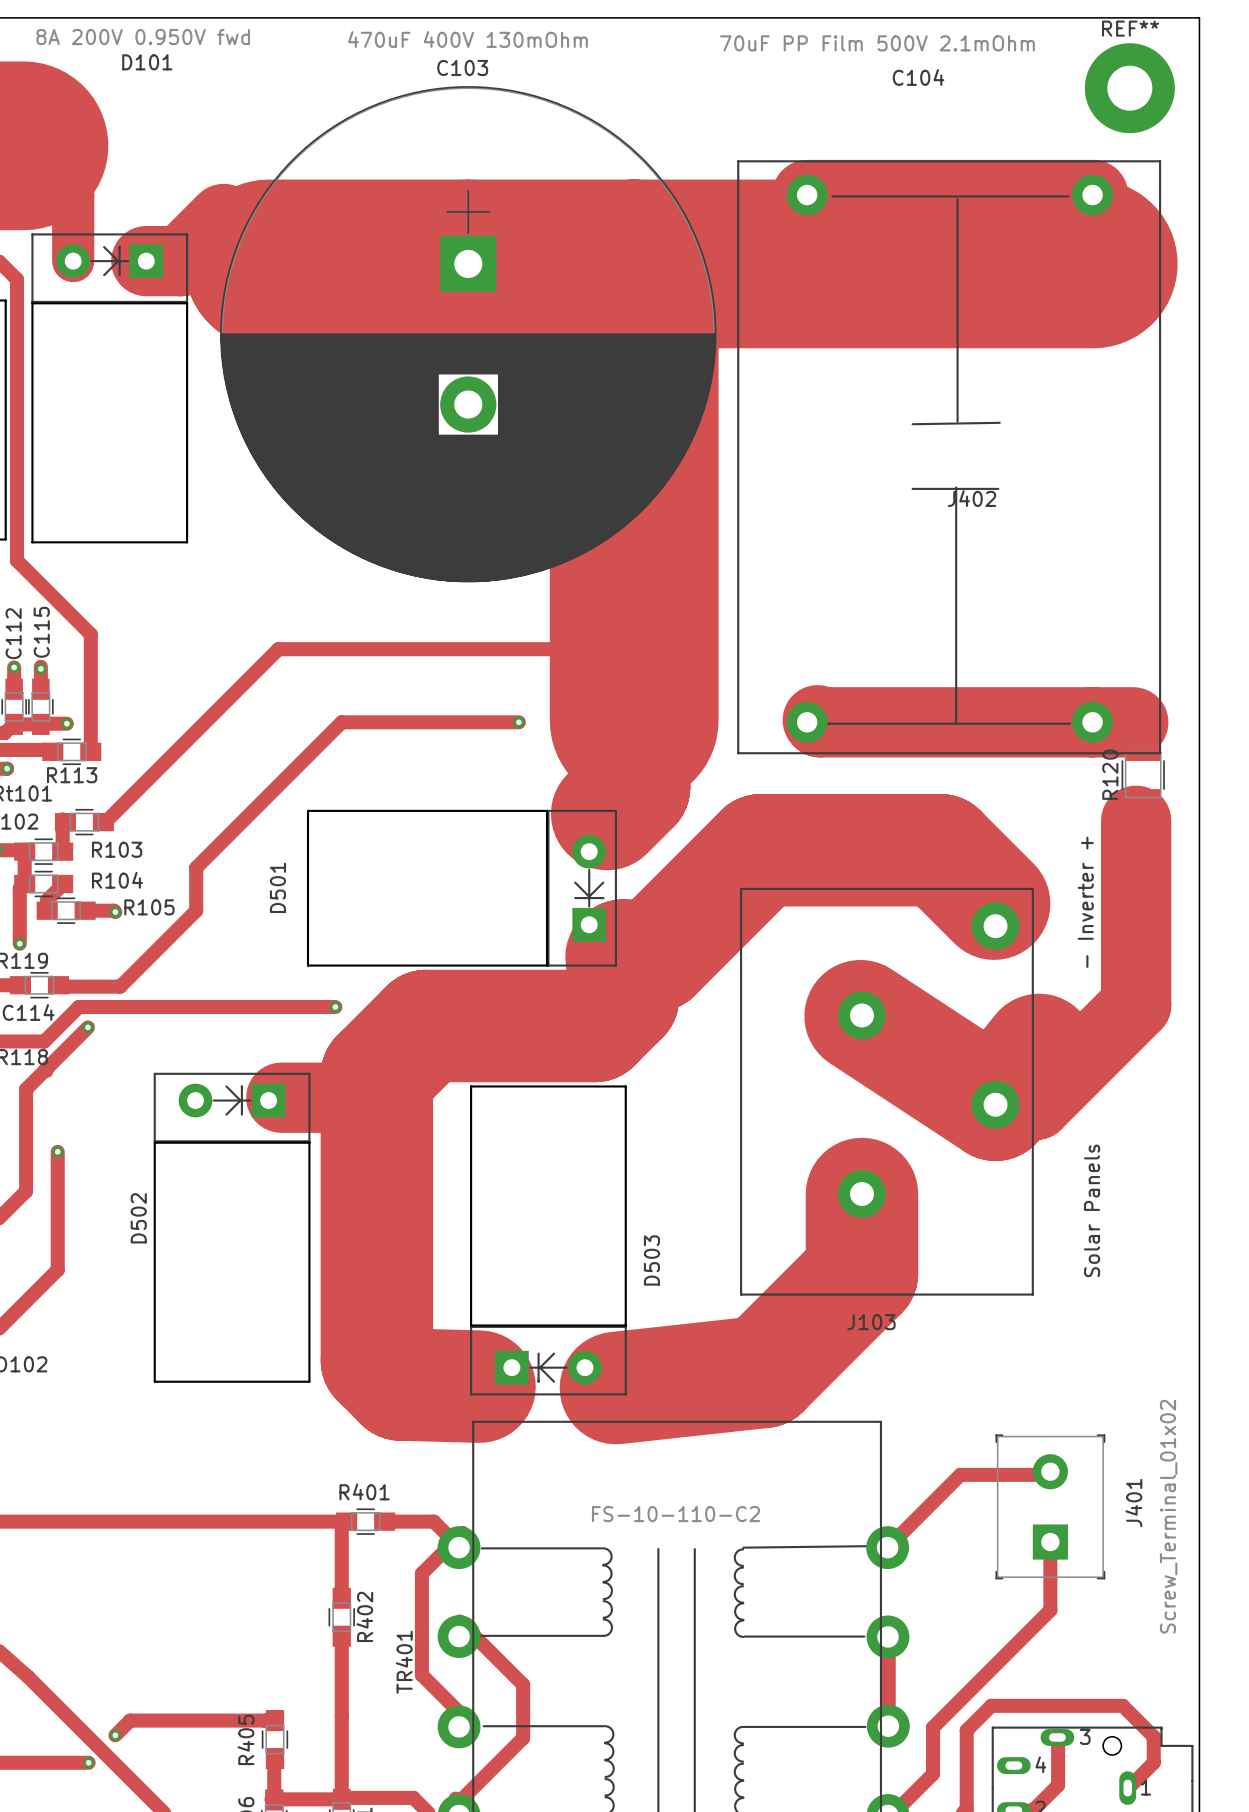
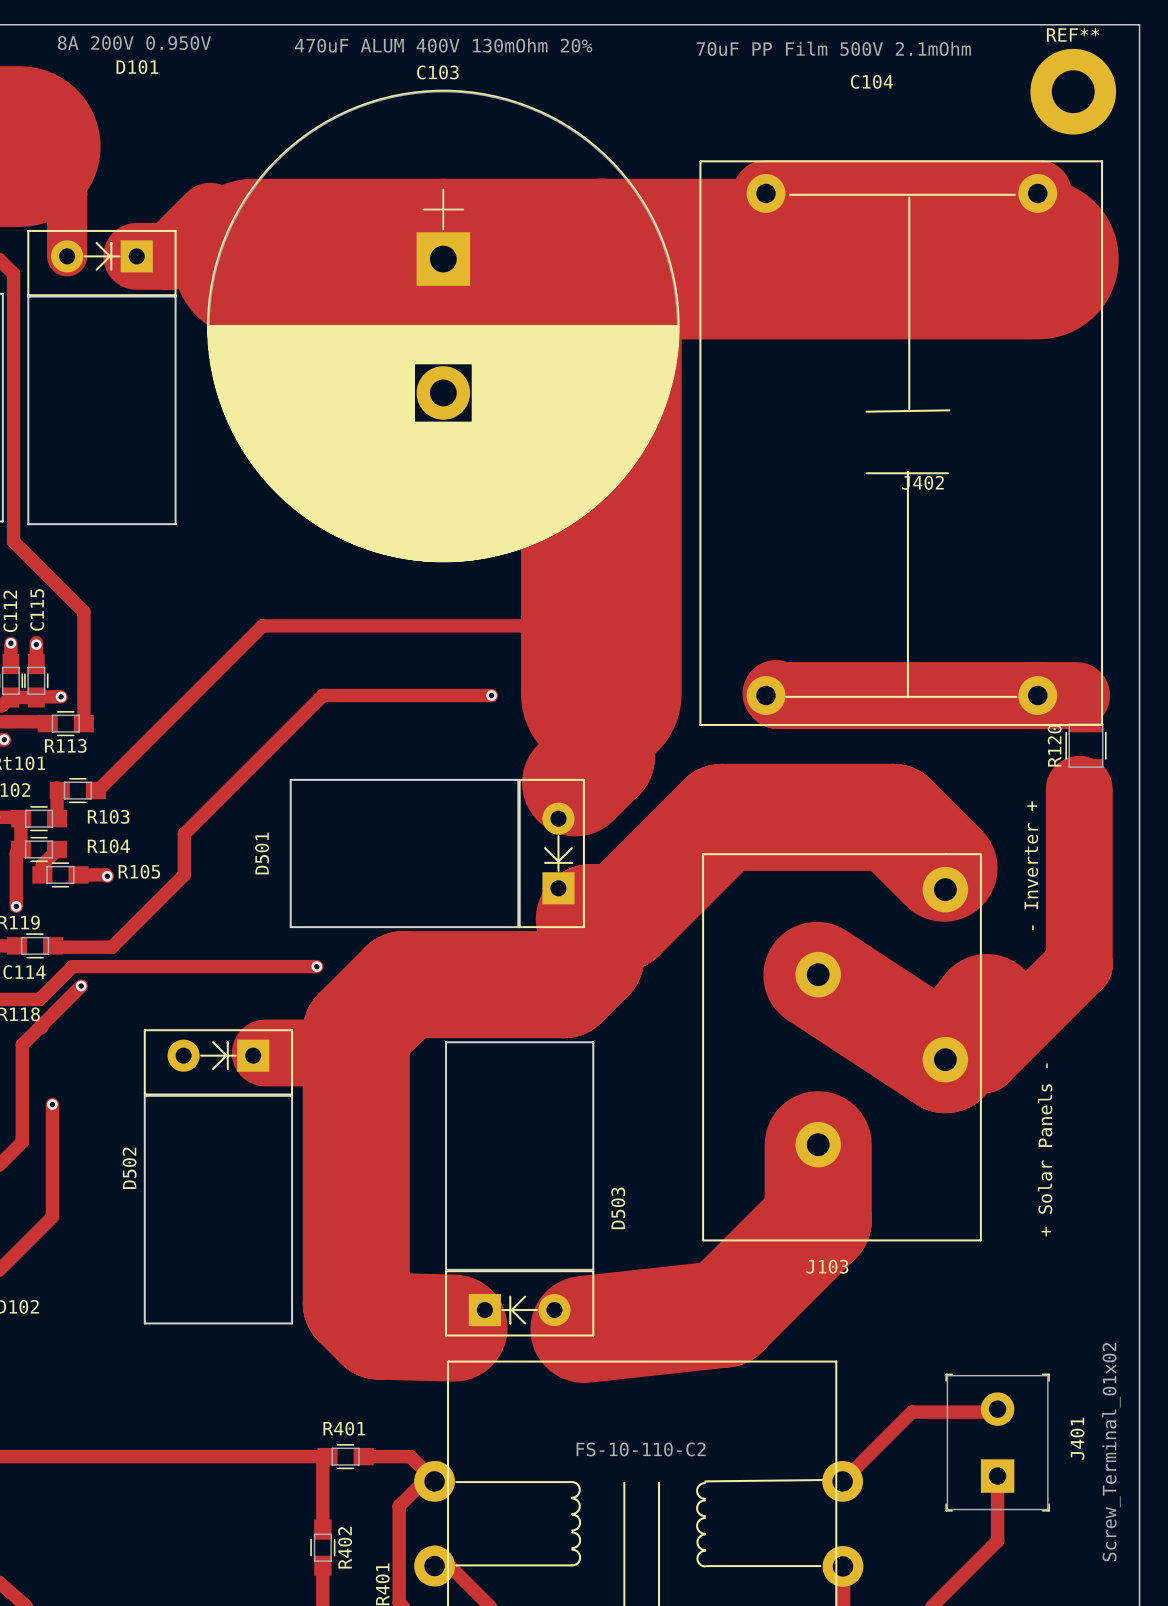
D101 value: 8A 200V 0.950V fwd (143, 37) -> 8A 200V 0.950V (134, 43)
C103 value: 470uF 400V 130mOhm (467, 39) -> 470uF ALUM 400V 130mOhm 20% (443, 45)
text: none -> + Solar Panels - (1045, 1149)
J103 value: Solar Panels (1092, 1210) -> none

